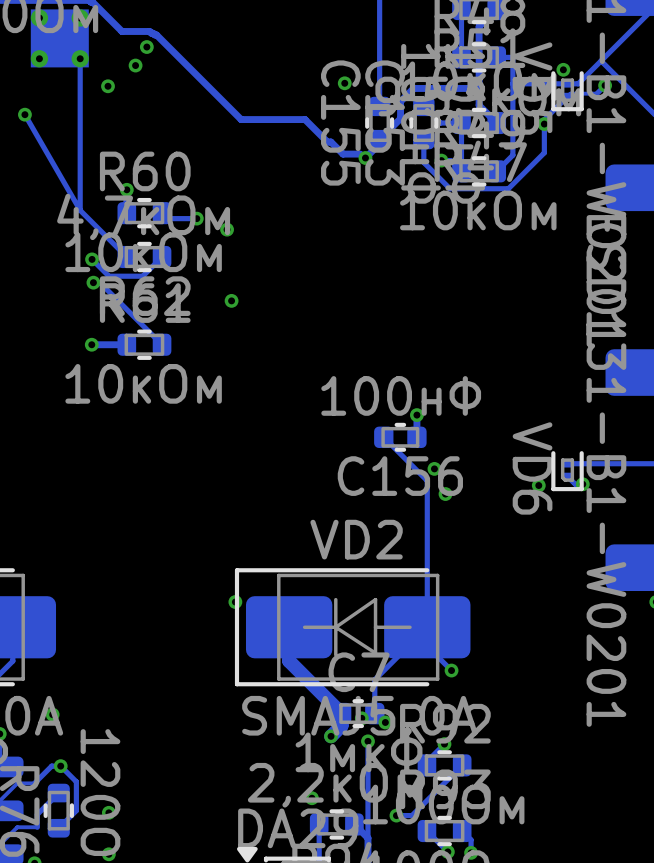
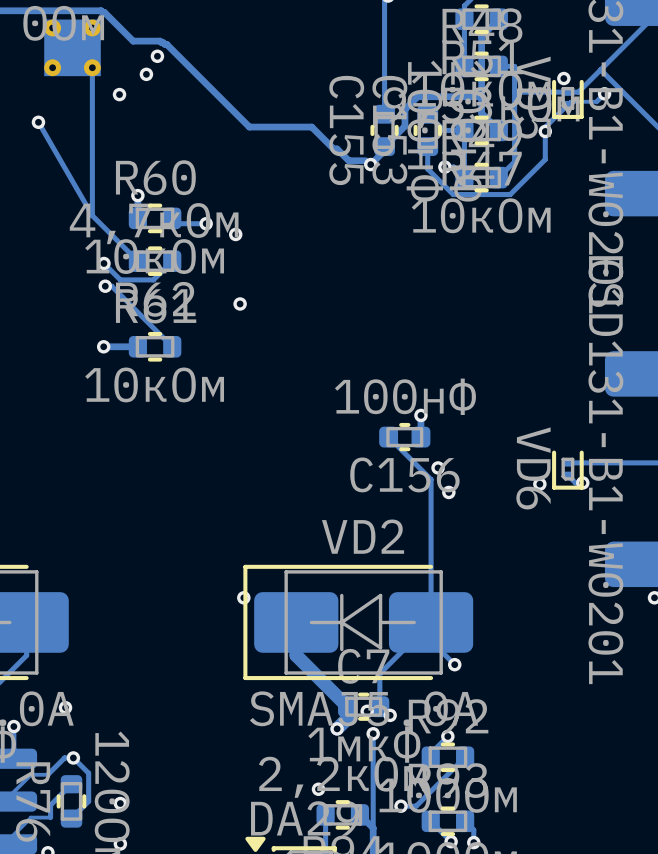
via: (344, 83) -> none

